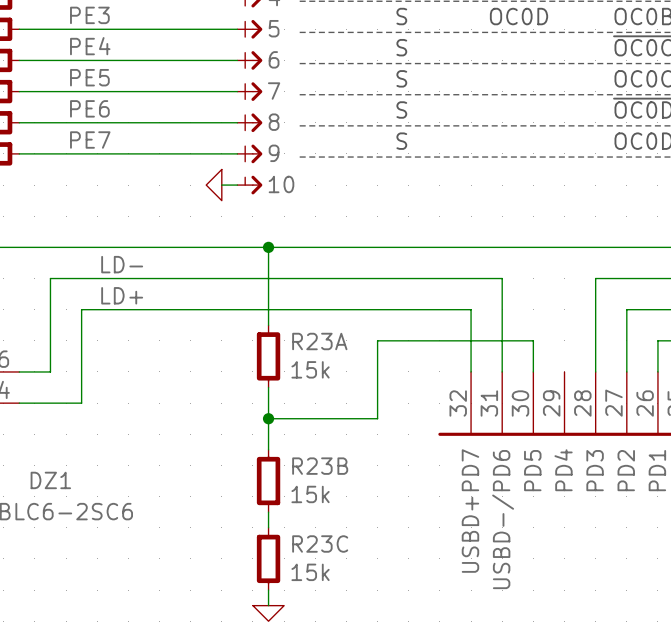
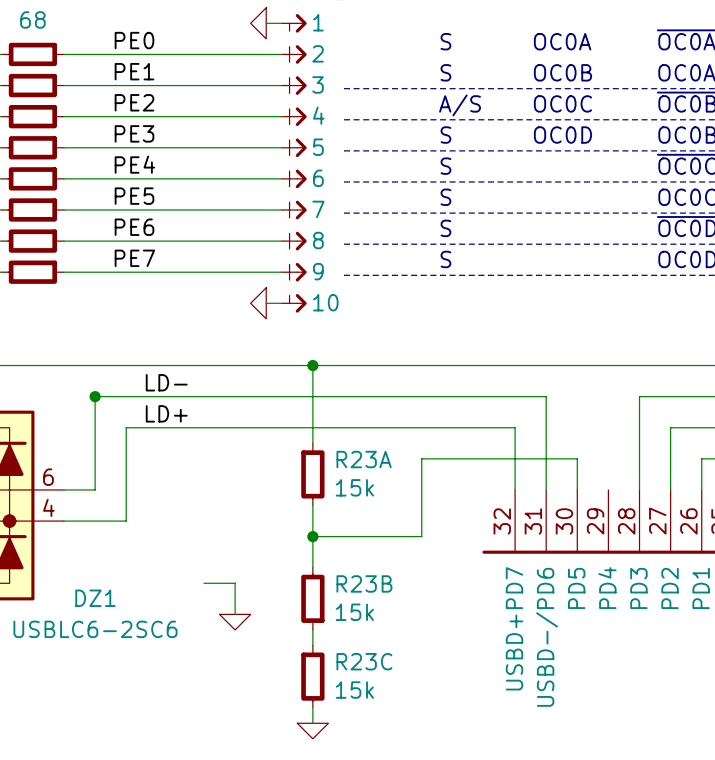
junction: none -> (95, 396)
wire: none -> (204, 583) (235, 583) (235, 614)
power symbol: none -> (235, 622)

